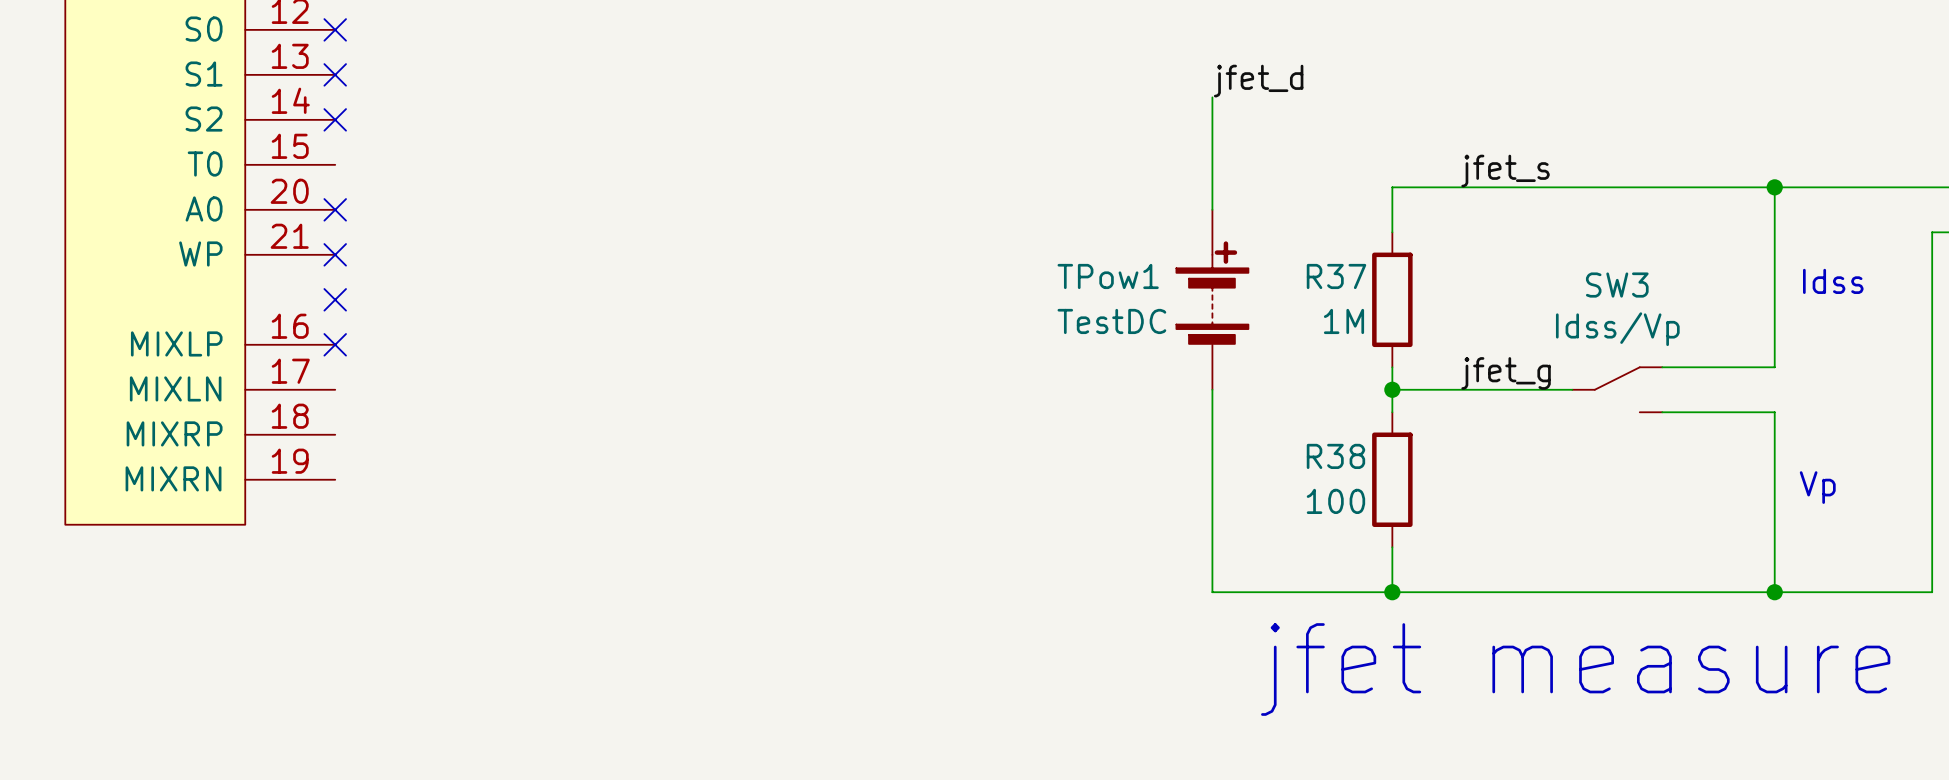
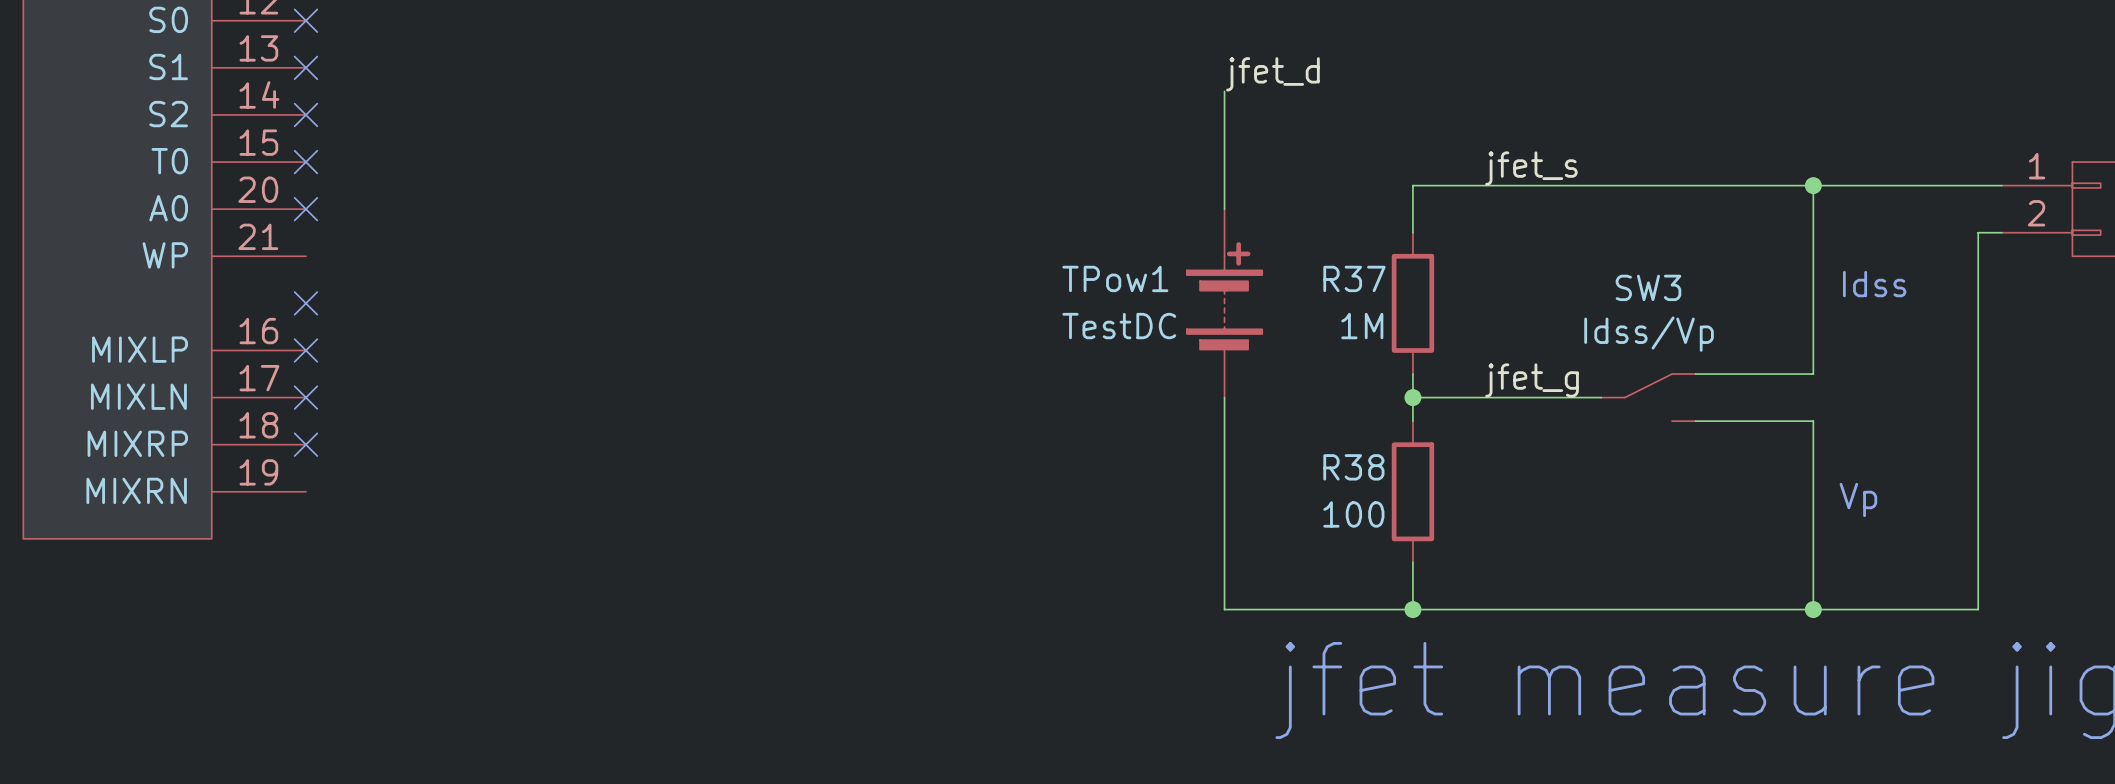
no-connect mark: none -> (305, 162)
no-connect mark: (335, 254) -> none
no-connect mark: none -> (305, 397)
no-connect mark: none -> (305, 444)

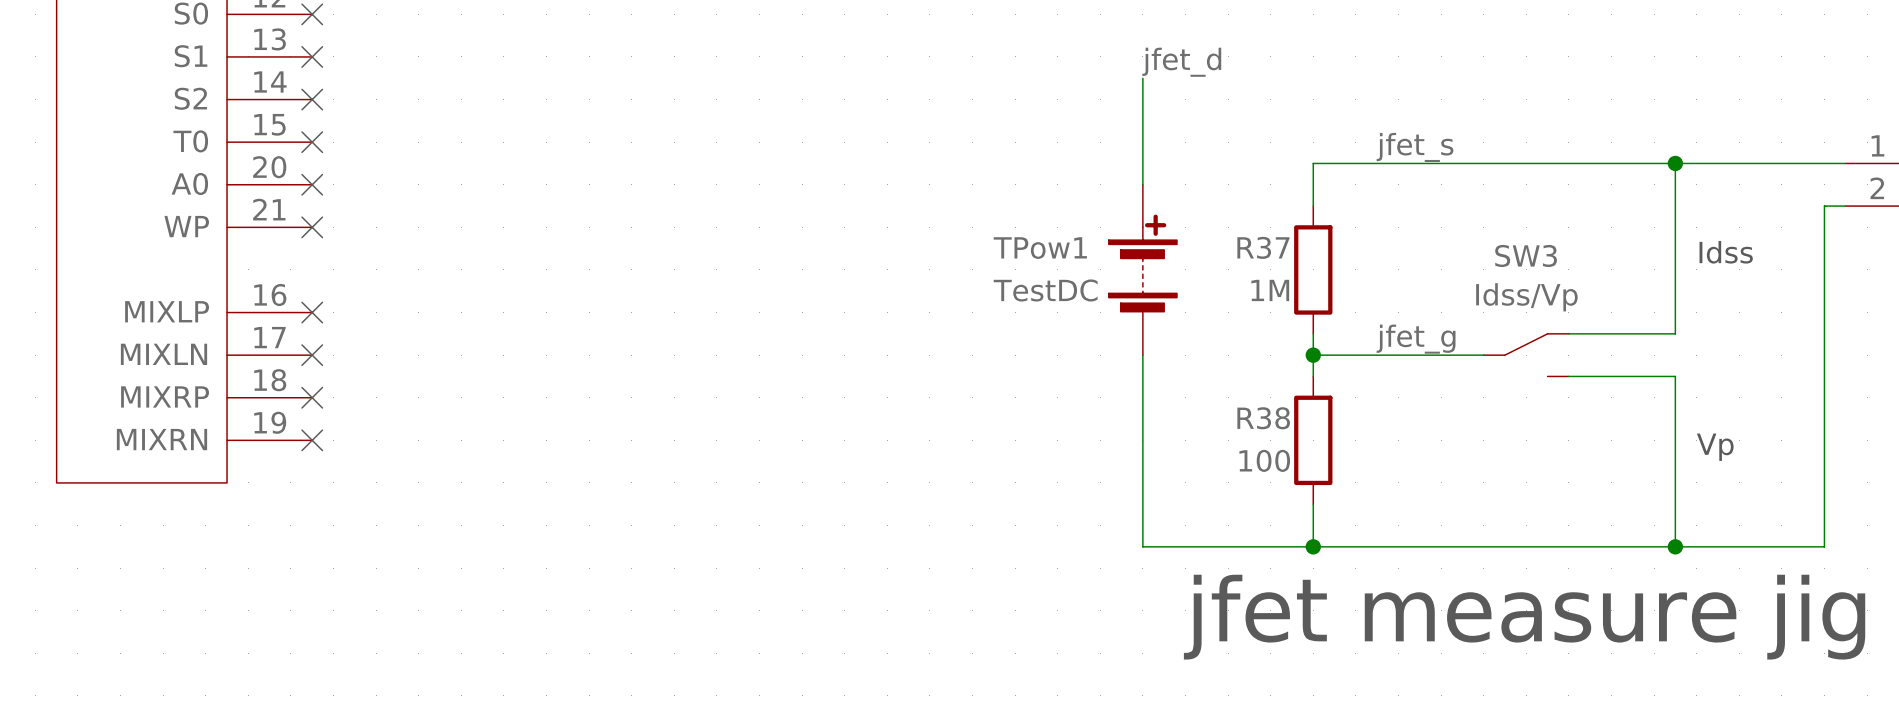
no-connect mark position: (305, 303) -> (312, 227)
no-connect mark: none -> (312, 440)

